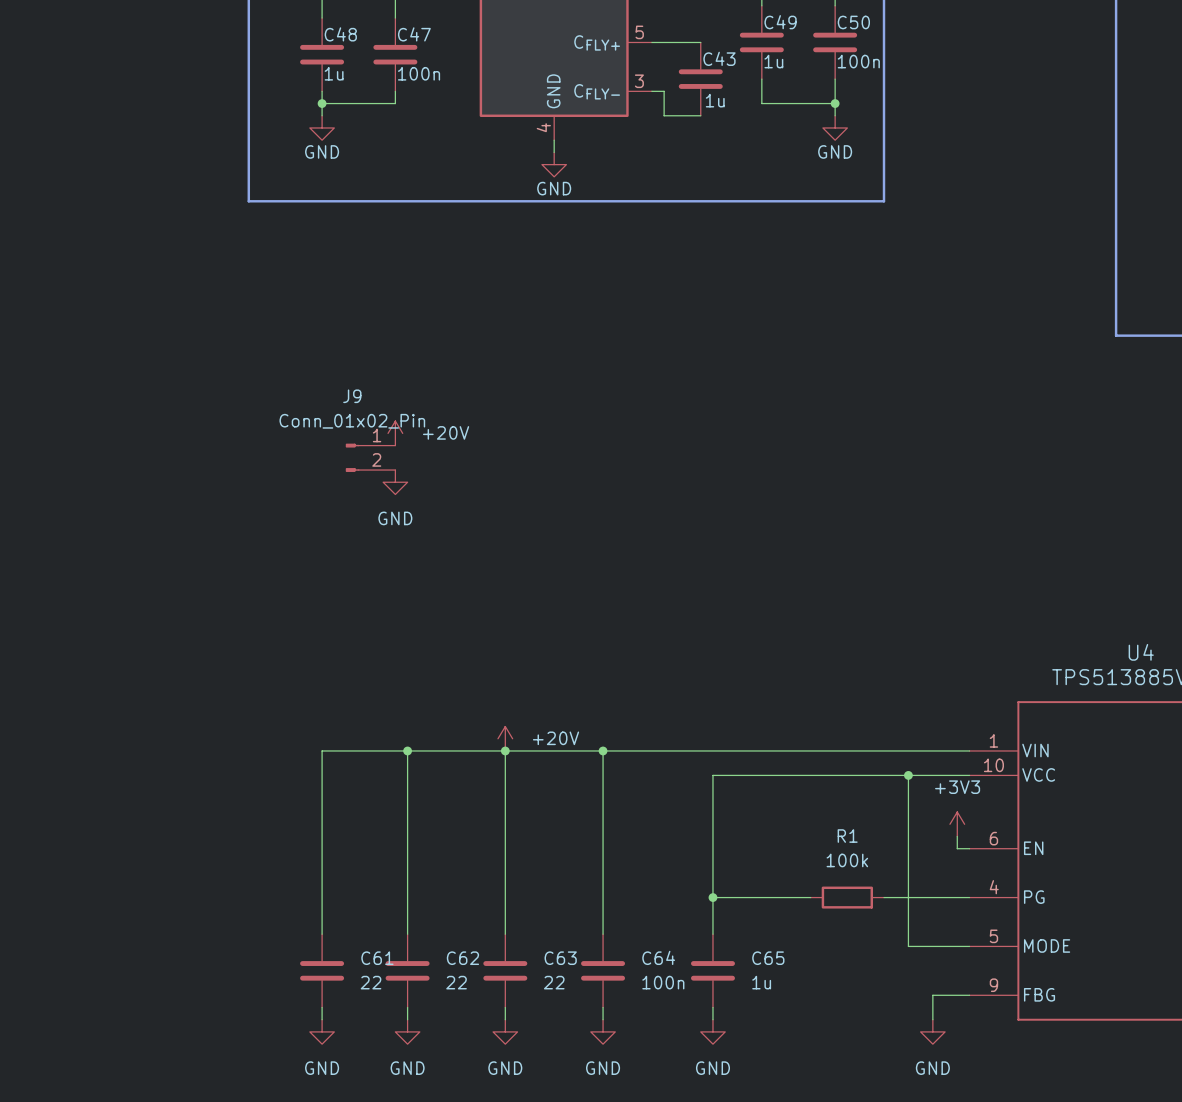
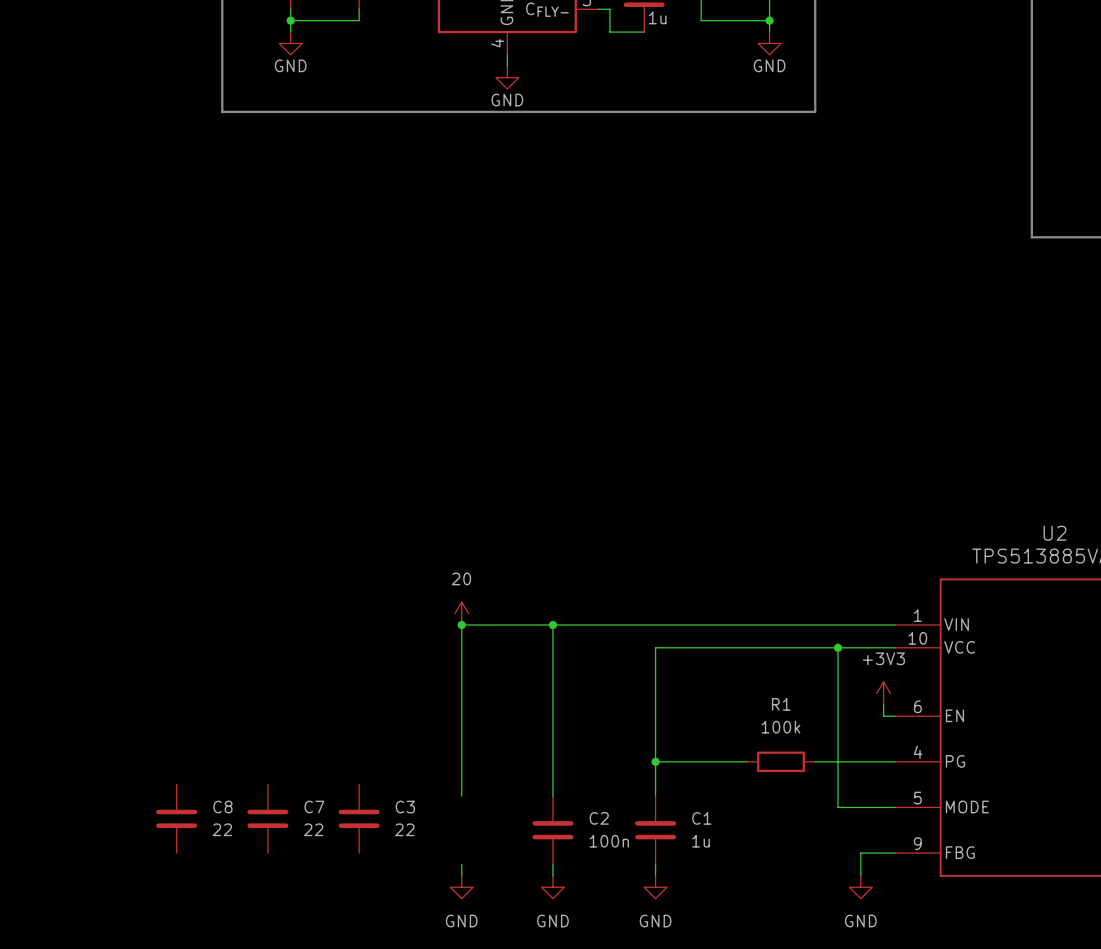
power symbol: +20V (395, 433) -> none
J9: Conn_01x02_Pin (370, 457) -> none
power symbol: GND (395, 482) -> none
U4 name: U4 (1141, 652) -> U2 (1054, 533)
power symbol: +20V (505, 738) -> 20 (461, 613)
wire: (407, 750) (407, 934) -> none
junction: (407, 750) -> none
wire: (505, 750) (322, 750) (322, 934) -> none
C64 name: C64 (658, 957) -> C2 (599, 818)
C8: none -> 22 (176, 818)
C7: none -> 22 (267, 818)
C3: none -> 22 (359, 818)
C65 name: C65 (768, 958) -> C1 (701, 818)
C61: 22 (322, 970) -> none
C62: 22 (407, 970) -> none
C63: 22 (505, 970) -> none
wire: (322, 1007) (322, 1019) -> none
wire: (407, 1007) (407, 1019) -> none
power symbol: GND (322, 1031) -> none
power symbol: GND (407, 1031) -> none

